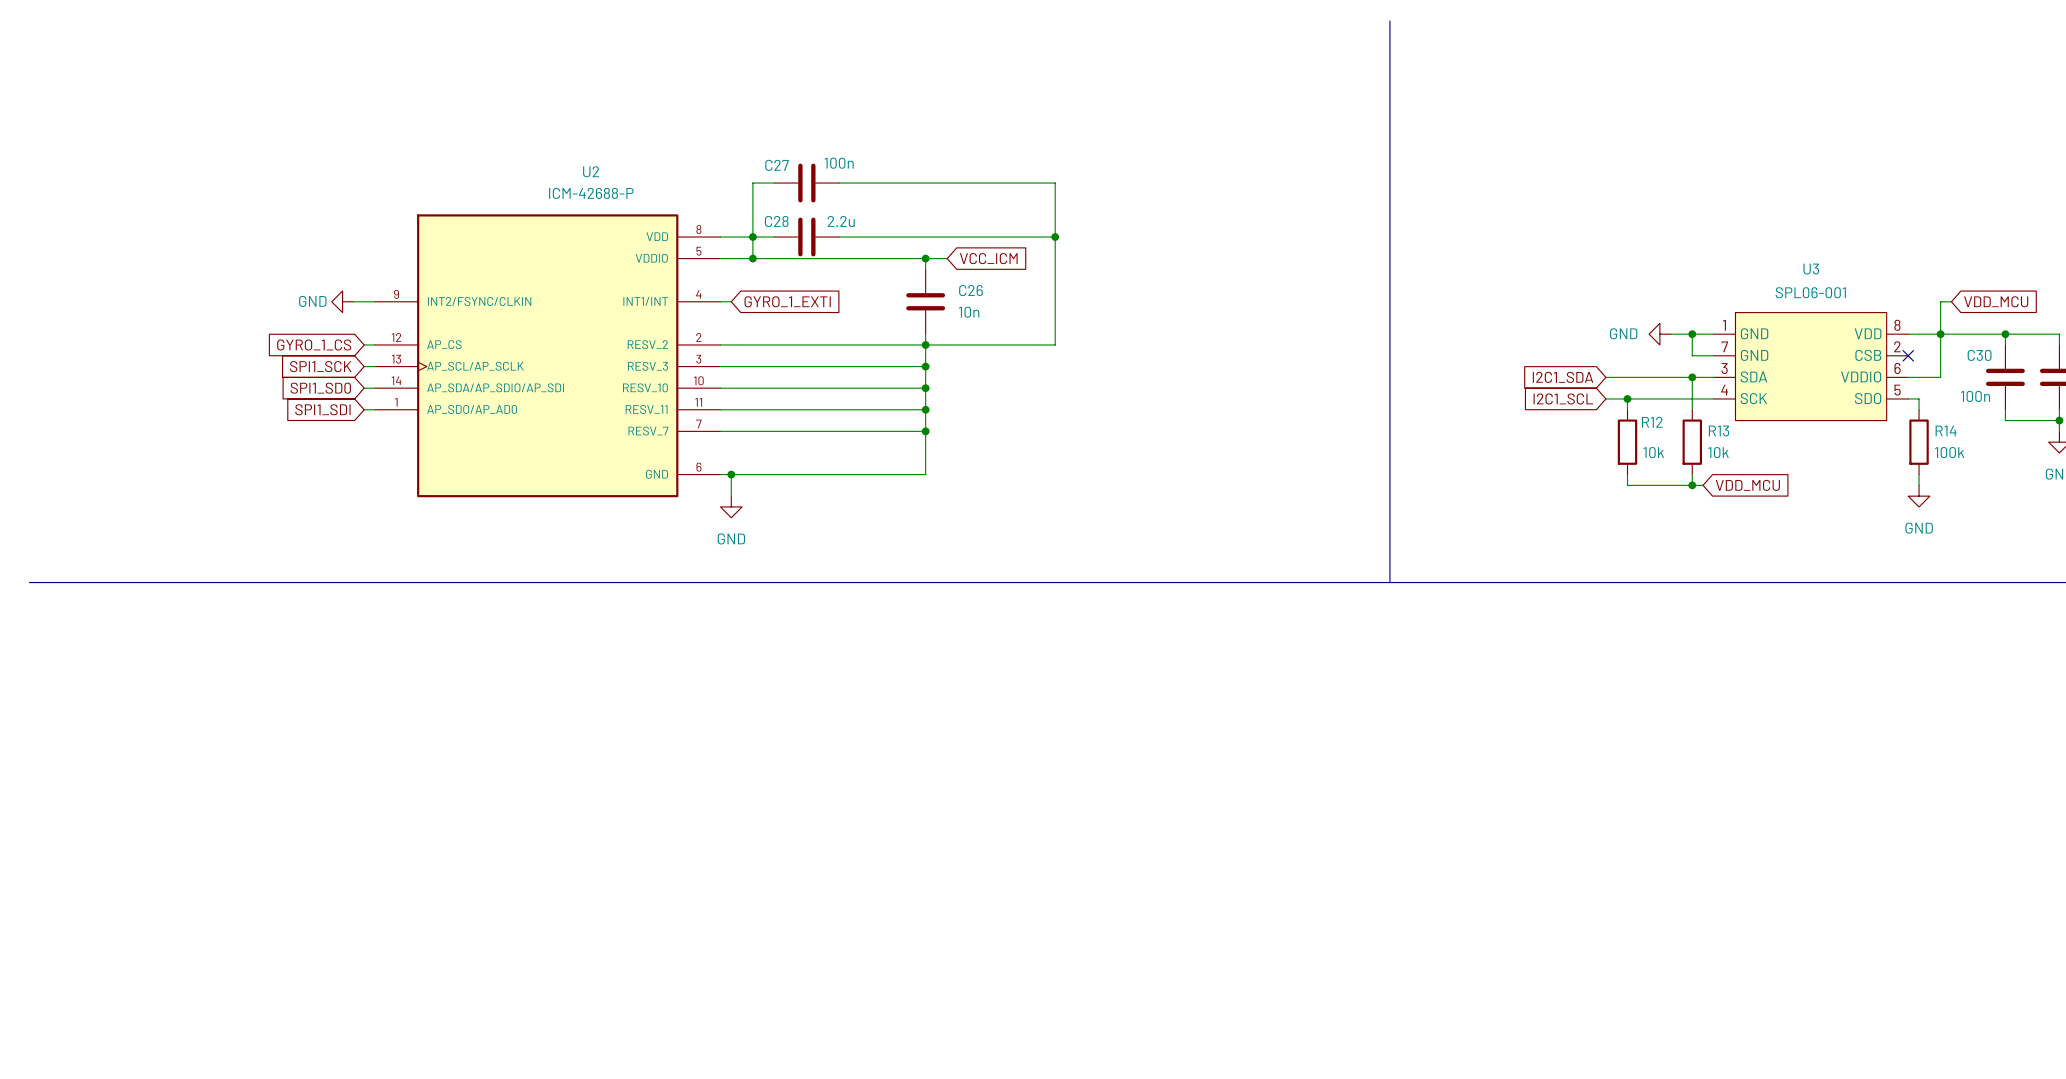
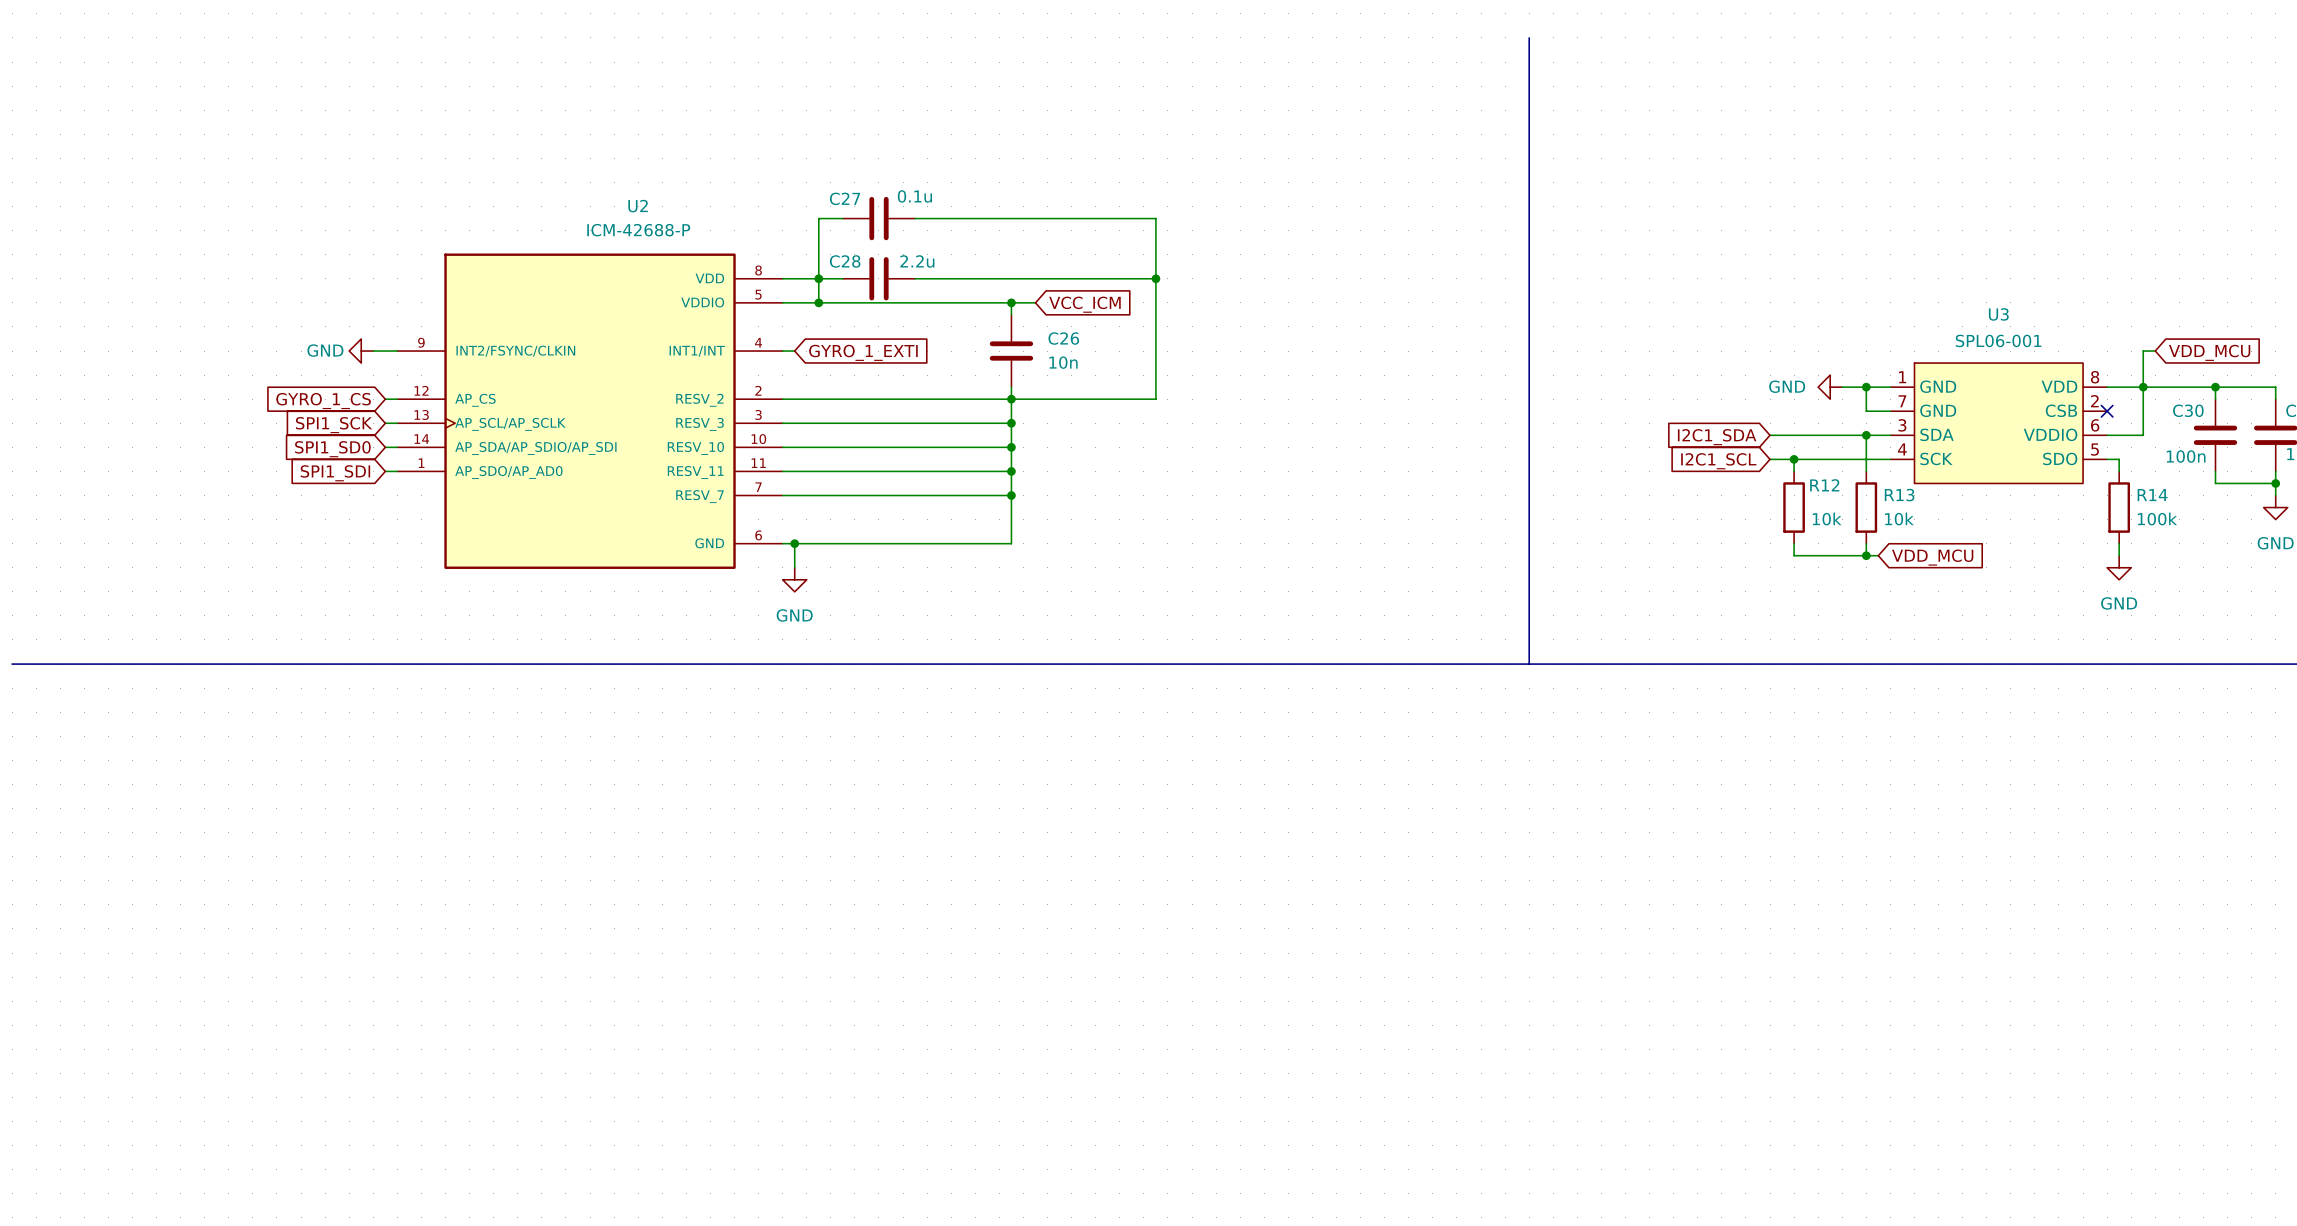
C27 value: 100n (839, 163) -> 0.1u (914, 196)

